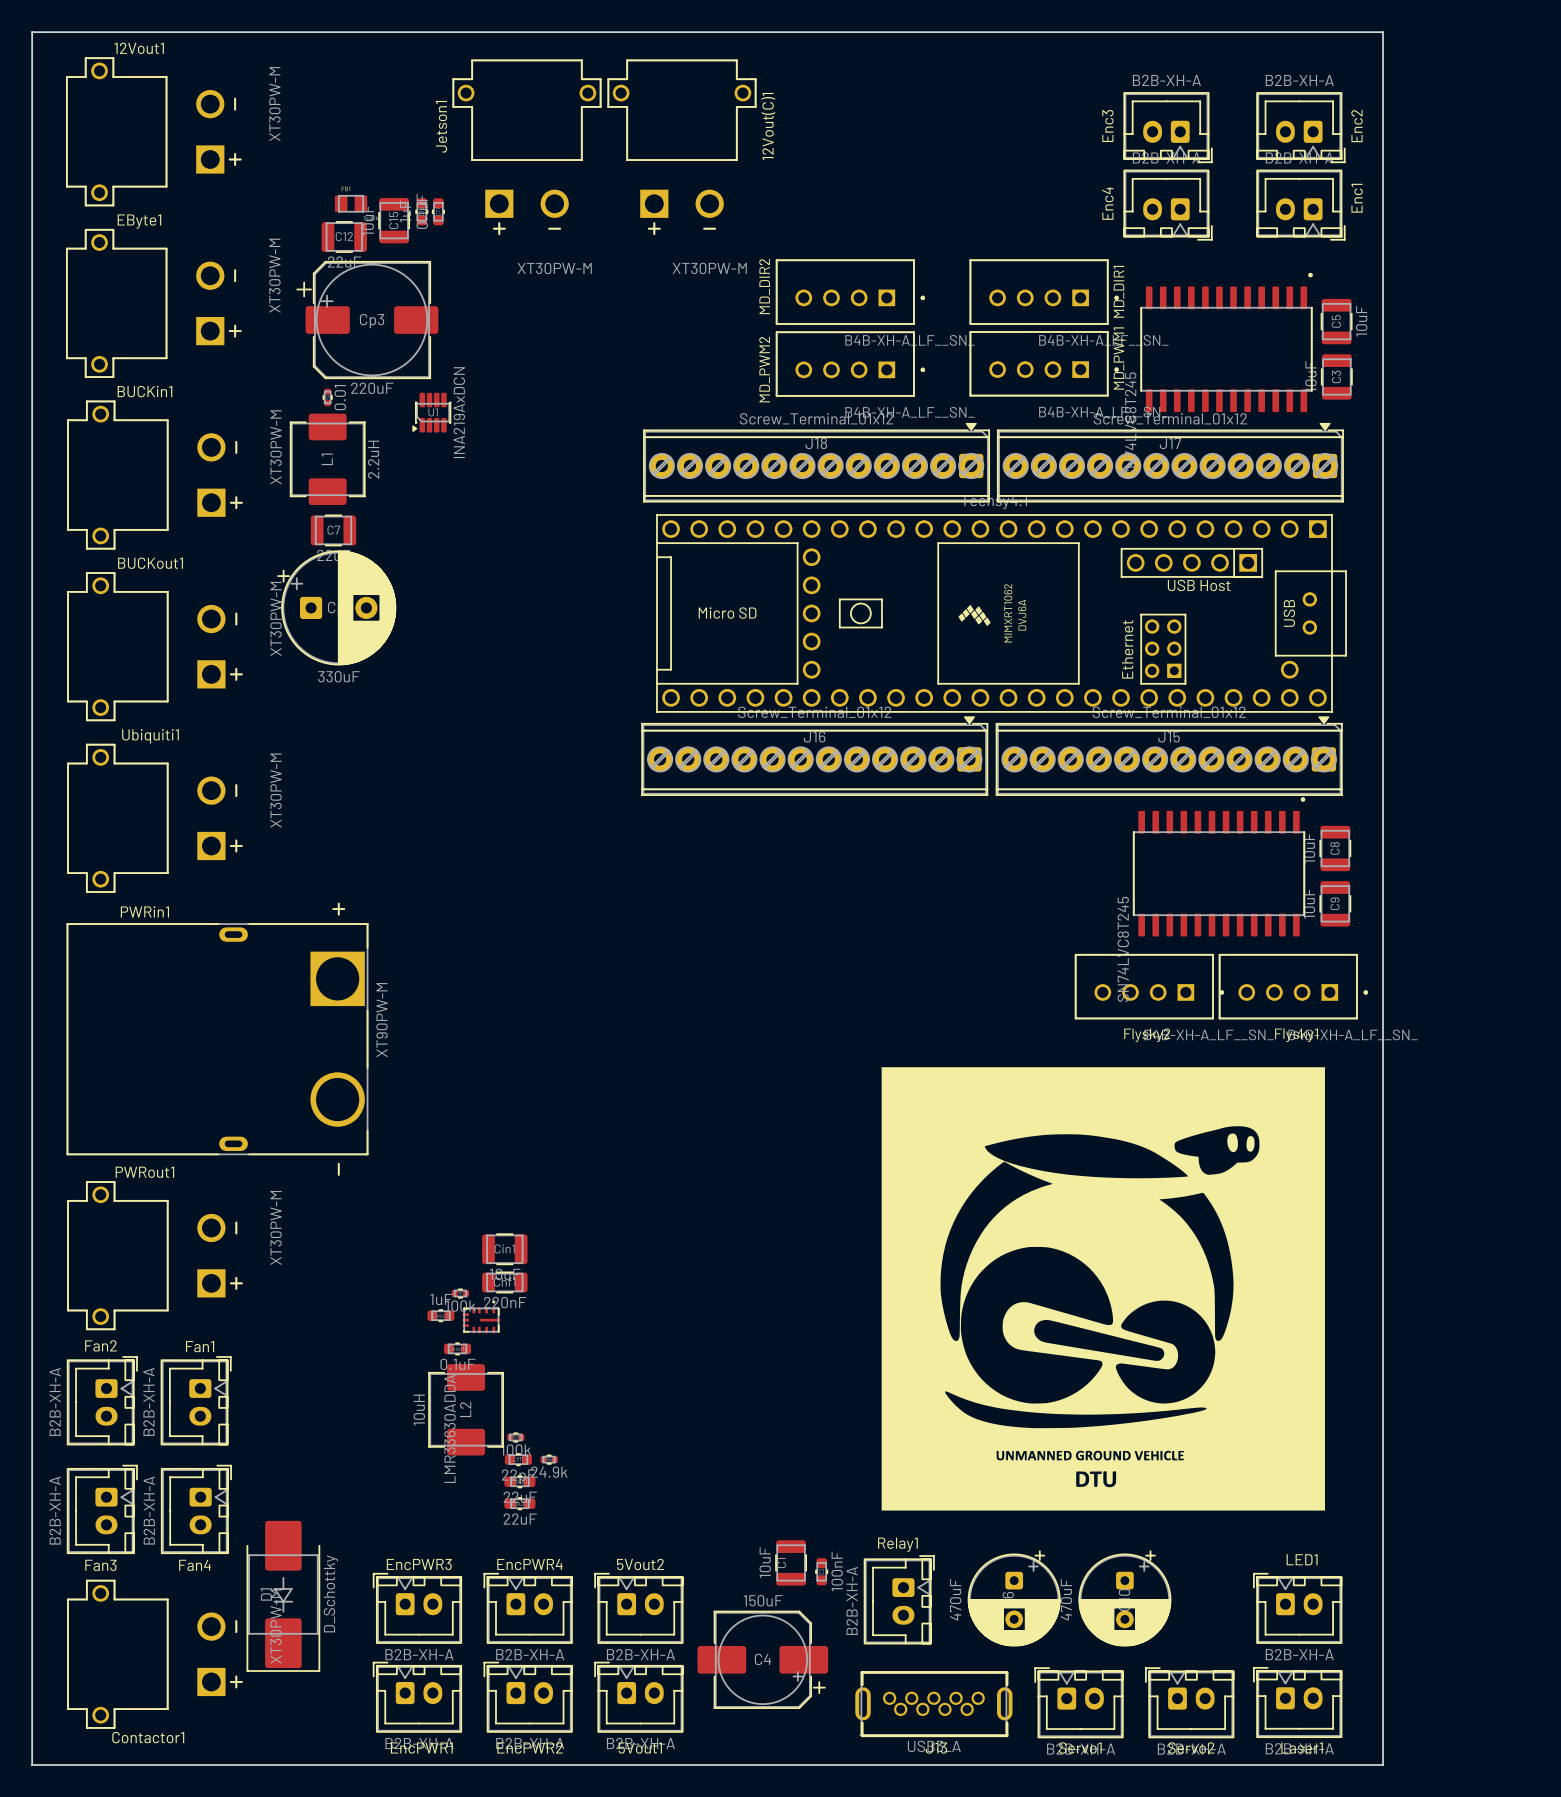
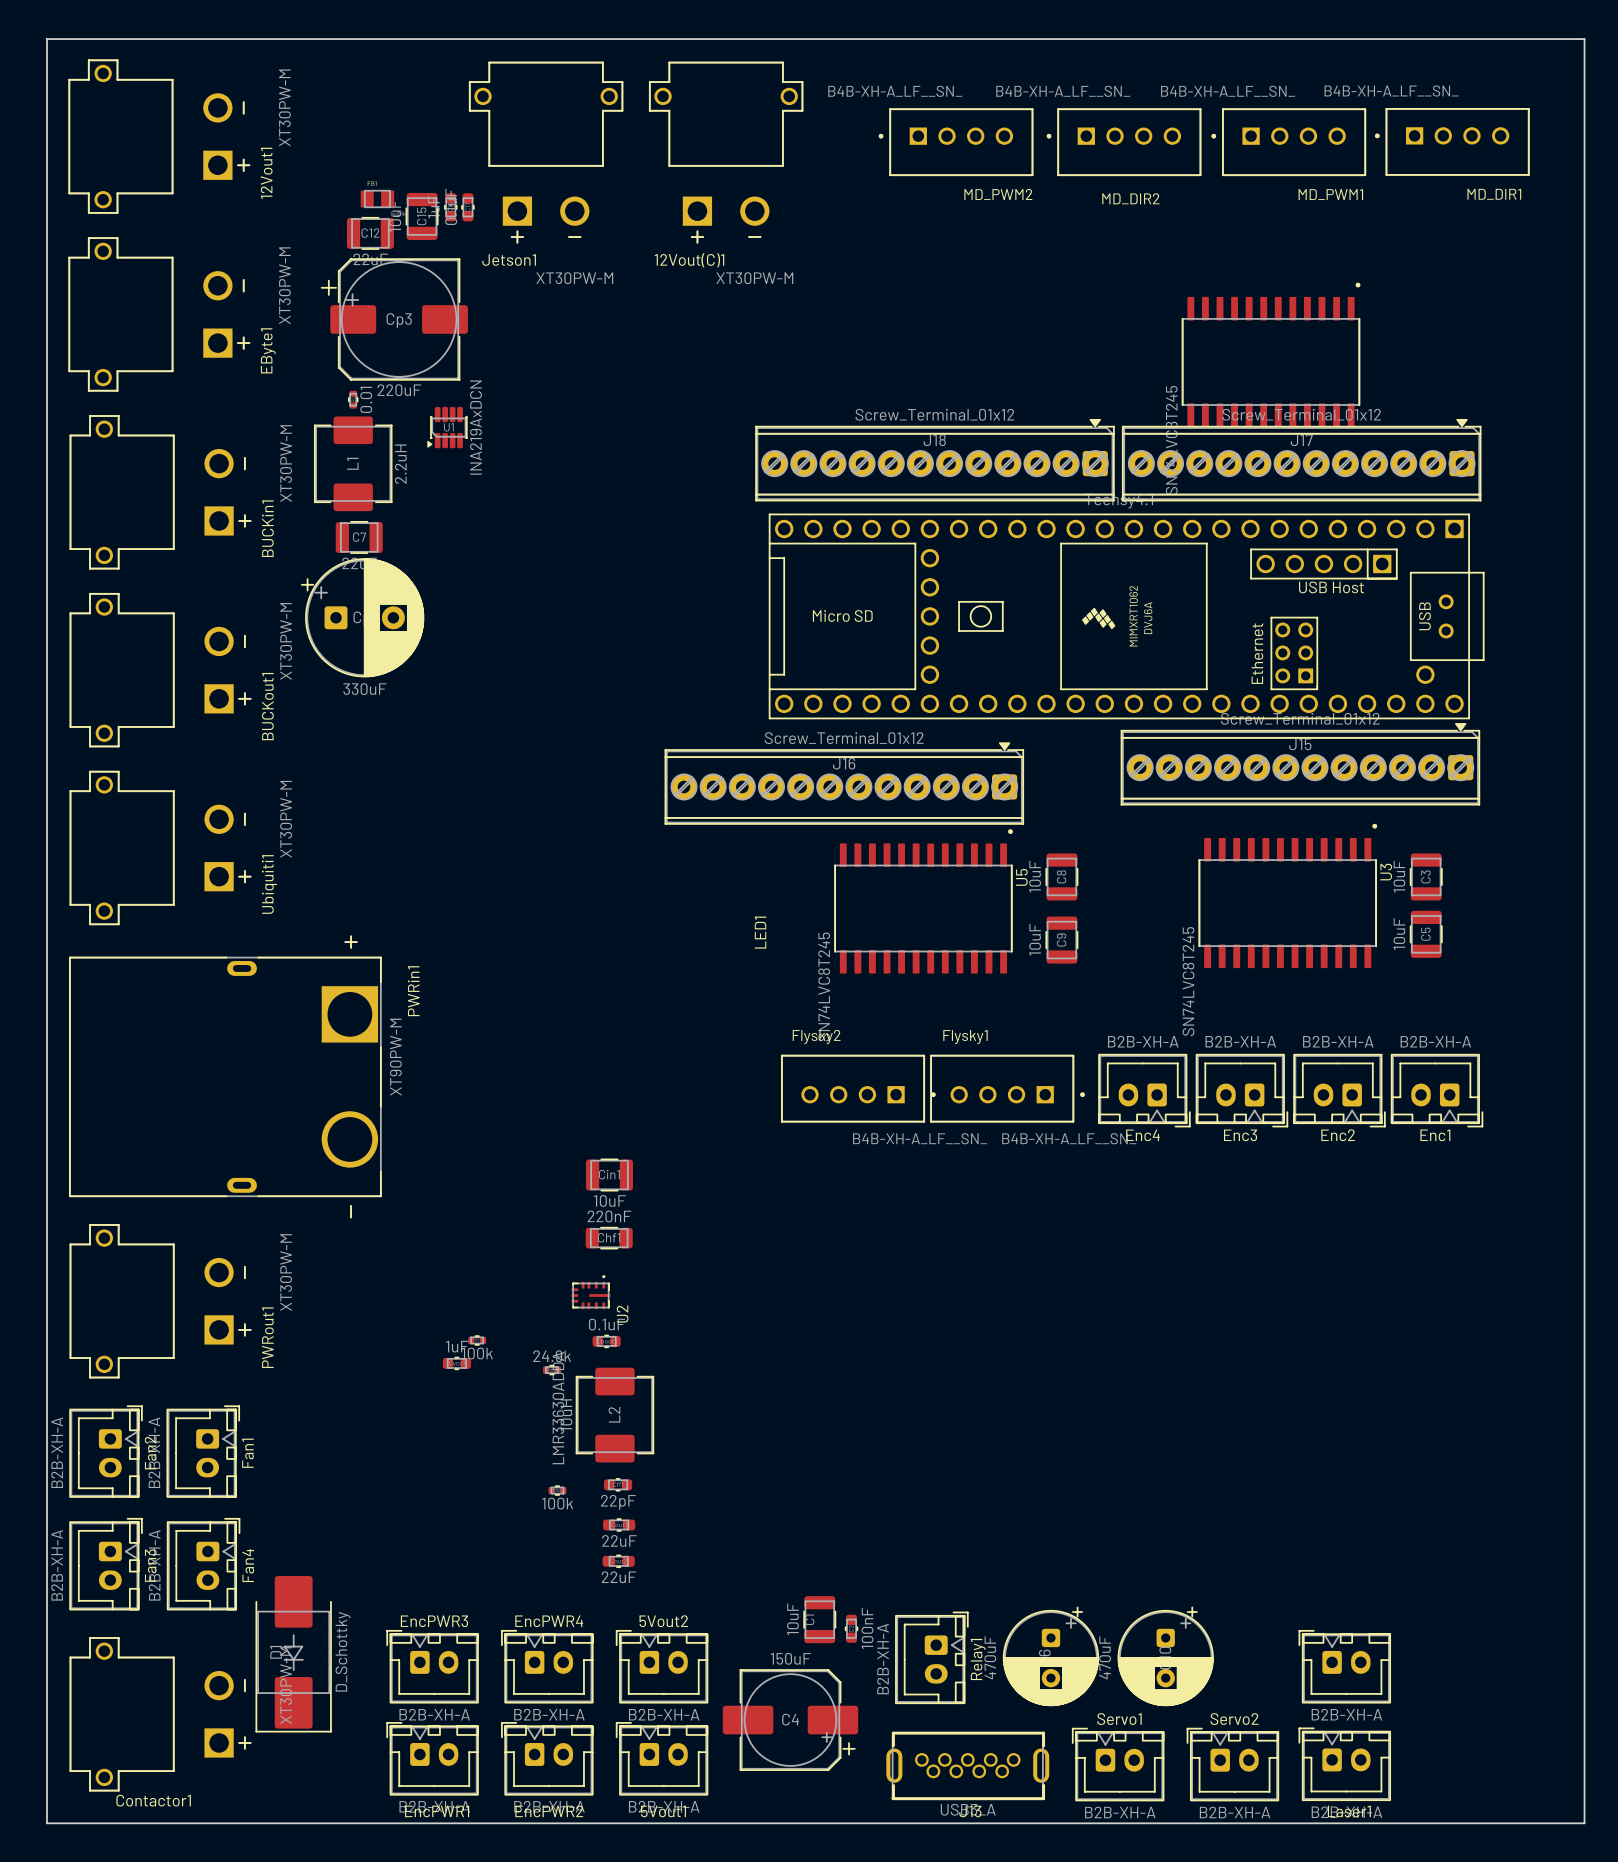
board edge: (32, 32) (1383, 32) (1383, 1765) (32, 1765) (32, 32) -> (46, 39) (46, 1823) (1584, 1823) (1584, 39) (46, 39)
12Vout1 name rotation: 0° (139, 48) -> 90° counterclockwise (266, 173)
12Vout1 name position: 12Vout1 (139, 48) -> 12Vout1 (266, 173)
Enc2 name rotation: 0° (1357, 125) -> 90° clockwise (1338, 1135)
Enc2 name position: Enc2 (1357, 125) -> Enc2 (1338, 1135)
Jetson1 name rotation: 0° (441, 126) -> 90° clockwise (509, 260)
Jetson1 name position: Jetson1 (441, 126) -> Jetson1 (509, 260)
12Vout(C)1 name rotation: 0° (768, 126) -> 90° clockwise (689, 260)
12Vout(C)1 name position: 12Vout(C)1 (768, 126) -> 12Vout(C)1 (689, 260)
Enc3 name rotation: 0° (1107, 126) -> 90° clockwise (1240, 1135)
Enc3 name position: Enc3 (1107, 126) -> Enc3 (1240, 1135)
Enc3 position: (1168, 127) -> (1241, 1090)
Enc2 position: (1300, 127) -> (1339, 1090)
12Vout(C)1 position: (682, 147) -> (726, 152)
Enc1 name rotation: 0° (1357, 198) -> 90° clockwise (1435, 1135)
Enc1 name position: Enc1 (1357, 198) -> Enc1 (1435, 1135)
part position: (351, 203) -> (377, 198)
Enc4 name rotation: 0° (1107, 203) -> 90° clockwise (1143, 1135)
Enc4 name position: Enc4 (1107, 203) -> Enc4 (1143, 1135)
Enc4 position: (1168, 205) -> (1144, 1090)
Enc1 position: (1300, 205) -> (1437, 1090)
part position: (421, 211) -> (450, 207)
part position: (438, 211) -> (467, 207)
C15 position: (394, 220) -> (422, 216)
EByte1 name rotation: 0° (139, 221) -> 90° counterclockwise (268, 350)
EByte1 name position: EByte1 (139, 221) -> EByte1 (268, 350)
C12 position: (344, 236) -> (370, 233)
MD_DIR2 name position: MD_DIR2 (764, 286) -> MD_DIR2 (1130, 198)
MD_DIR1 name position: MD_DIR1 (1118, 291) -> MD_DIR1 (1494, 194)
MD_DIR2 rotation: 0° (850, 292) -> 180° (1123, 142)
MD_DIR2 position: (850, 292) -> (1123, 142)
MD_DIR1 rotation: 0° (1044, 292) -> 180° (1452, 141)
MD_DIR1 position: (1044, 292) -> (1452, 141)
Cp3 position: (367, 320) -> (394, 319)
C5 position: (1336, 321) -> (1426, 934)
C5 value position: 10uF (1361, 321) -> 10uF (1399, 934)
MD_PWM1 name position: MD_PWM1 (1118, 358) -> MD_PWM1 (1330, 194)
MD_PWM1 rotation: 0° (1044, 363) -> 180° (1288, 142)
MD_PWM1 position: (1044, 363) -> (1288, 142)
MD_PWM2 rotation: 0° (850, 364) -> 180° (955, 142)
MD_PWM2 position: (850, 364) -> (955, 142)
MD_PWM2 name position: MD_PWM2 (764, 369) -> MD_PWM2 (998, 194)
C3 position: (1336, 376) -> (1426, 876)
BUCKin1 name rotation: 0° (144, 391) -> 90° counterclockwise (267, 528)
BUCKin1 name position: BUCKin1 (144, 391) -> BUCKin1 (267, 528)
part position: (327, 397) -> (353, 399)
L1 position: (327, 459) -> (353, 463)
J18 position: (816, 462) -> (934, 460)
J17 position: (1170, 462) -> (1301, 460)
C7 position: (333, 530) -> (359, 537)
BUCKout1 name rotation: 0° (150, 563) -> 90° counterclockwise (267, 706)
BUCKout1 name position: BUCKout1 (150, 563) -> BUCKout1 (267, 706)
part position: (336, 607) -> (362, 617)
part position: (1001, 613) -> (1126, 616)
Ubiquiti1 name rotation: 0° (150, 736) -> 90° counterclockwise (269, 884)
Ubiquiti1 name position: Ubiquiti1 (150, 736) -> Ubiquiti1 (269, 884)
J15 position: (1169, 756) -> (1300, 764)
C8 position: (1335, 848) -> (1061, 876)
U3: none -> SN74LVC8T245 (1287, 895)
part: SN74LVC8T245 (1219, 866) -> none
U5: none -> SN74LVC8T245 (923, 901)
C9 position: (1335, 903) -> (1061, 940)
PWRin1 name rotation: 0° (144, 911) -> 90° counterclockwise (413, 991)
PWRin1 name position: PWRin1 (144, 911) -> PWRin1 (413, 991)
Flysky2 position: (1149, 986) -> (858, 1088)
Flysky1 position: (1293, 986) -> (1007, 1088)
Flysky2 name position: Flysky2 (1147, 1035) -> Flysky2 (816, 1036)
Flysky1 name position: Flysky1 (1296, 1035) -> Flysky1 (965, 1037)
drawing: [881, 1067, 1326, 1511] -> none
PWRout1 name rotation: 0° (144, 1172) -> 90° counterclockwise (267, 1337)
PWRout1 name position: PWRout1 (144, 1172) -> PWRout1 (267, 1337)
U2: none -> LMR33630ADDA (590, 1292)
Cin1 position: (504, 1249) -> (609, 1175)
Chf1 position: (504, 1282) -> (609, 1238)
Chf1 value position: 220nF (505, 1302) -> 220nF (609, 1216)
part: LMR33630ADDA (481, 1317) -> none
Fan2 name rotation: 0° (100, 1345) -> 90° counterclockwise (150, 1452)
Fan2 name position: Fan2 (100, 1345) -> Fan2 (150, 1452)
Fan1 name rotation: 0° (200, 1346) -> 90° counterclockwise (247, 1453)
Fan1 name position: Fan1 (200, 1346) -> Fan1 (247, 1453)
part position: (457, 1348) -> (606, 1341)
part value position: 0.1uF (457, 1364) -> 0.1uF (607, 1324)
L2 position: (466, 1409) -> (614, 1415)
part position: (515, 1437) -> (557, 1490)
part position: (518, 1459) -> (618, 1484)
part position: (549, 1459) -> (551, 1370)
part value position: 24.9k (549, 1472) -> 24.9k (552, 1356)
part position: (519, 1481) -> (619, 1524)
part position: (519, 1503) -> (618, 1561)
Relay1 name rotation: 0° (897, 1544) -> 90° counterclockwise (978, 1659)
Relay1 name position: Relay1 (897, 1544) -> Relay1 (978, 1659)
LED1 name rotation: 0° (1302, 1559) -> 90° counterclockwise (760, 932)
LED1 name position: LED1 (1302, 1559) -> LED1 (760, 932)
Fan3 name rotation: 0° (100, 1565) -> 90° counterclockwise (150, 1565)
Fan3 name position: Fan3 (100, 1565) -> Fan3 (150, 1565)
Fan4 name rotation: 0° (195, 1565) -> 90° counterclockwise (248, 1565)
Fan4 name position: Fan4 (195, 1565) -> Fan4 (248, 1565)
Servo1 name position: Servo1 (1080, 1748) -> Servo1 (1119, 1719)
Servo2 name position: Servo2 (1191, 1748) -> Servo2 (1234, 1719)

